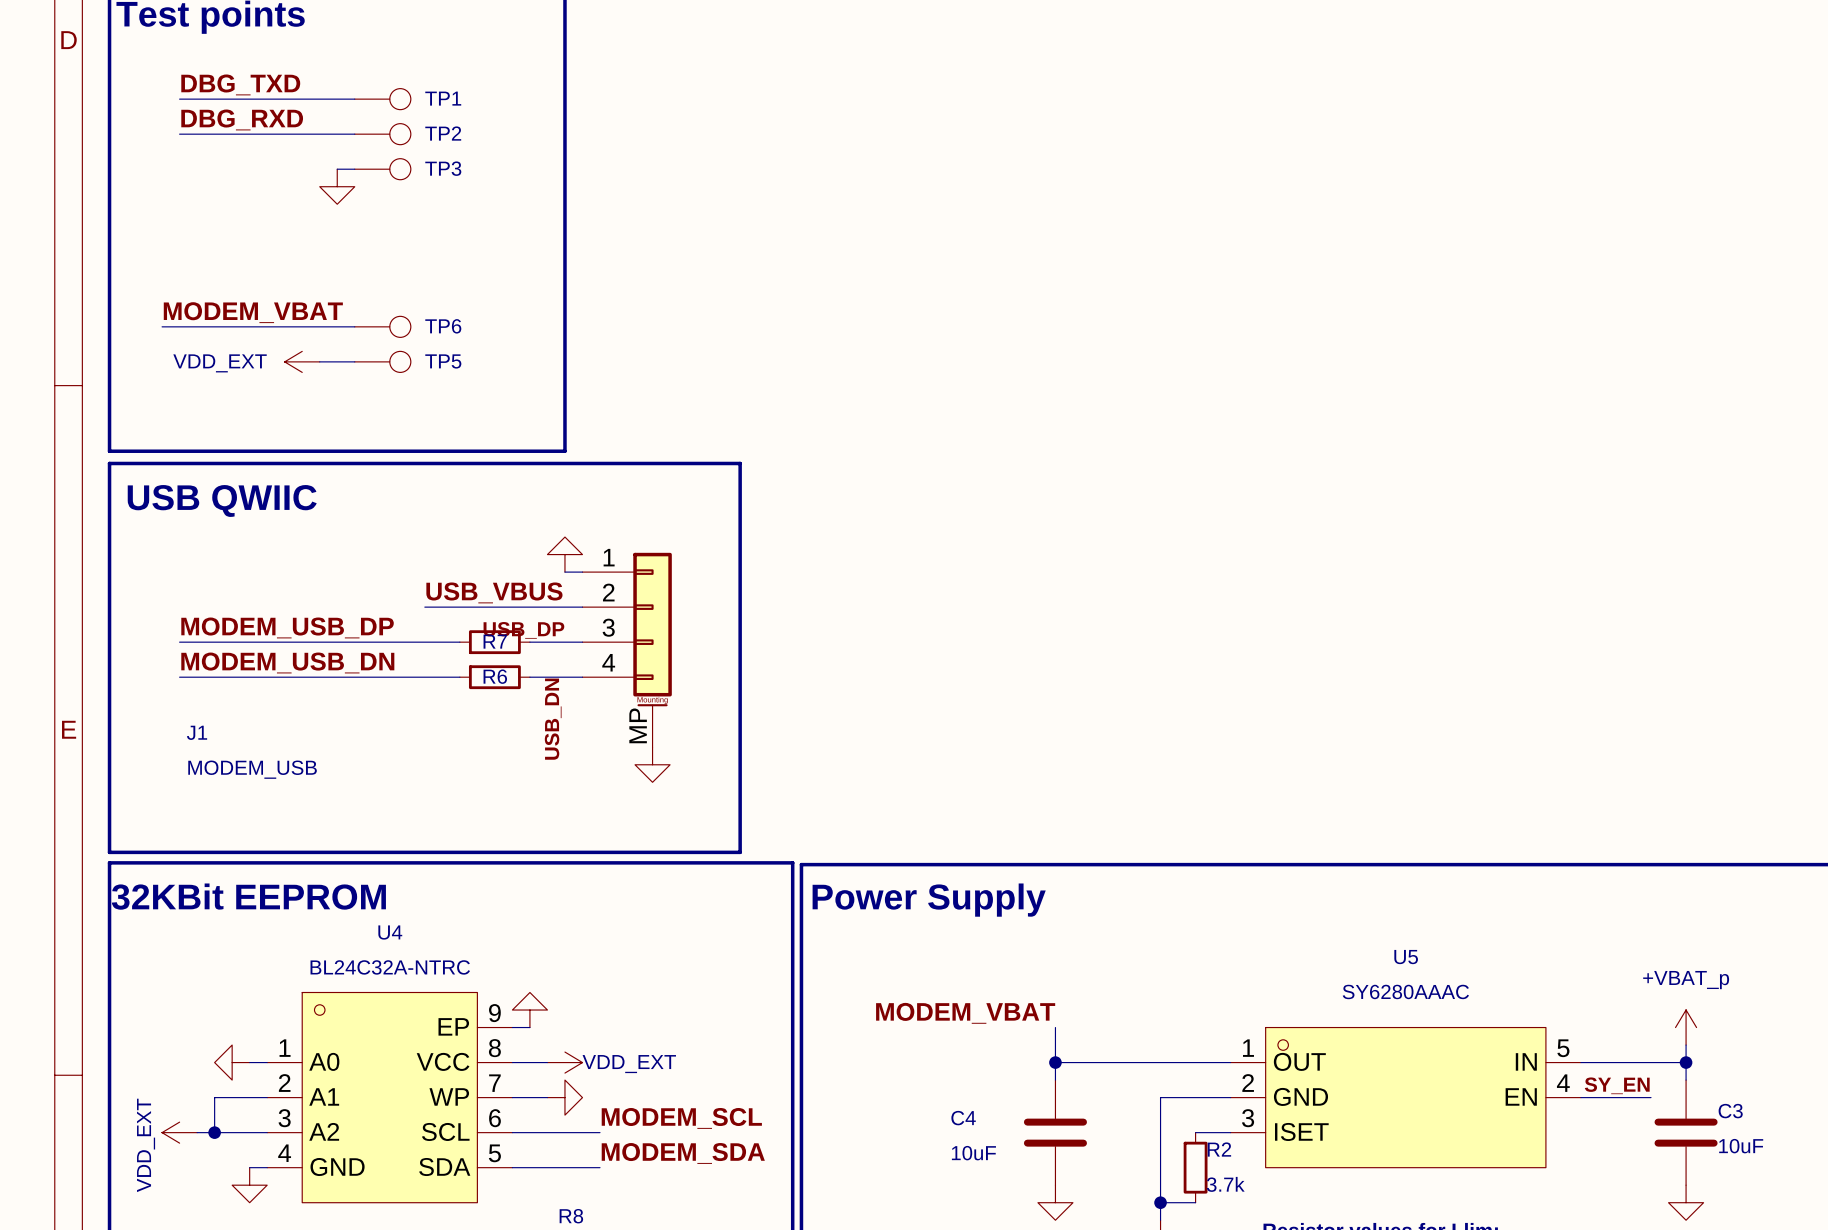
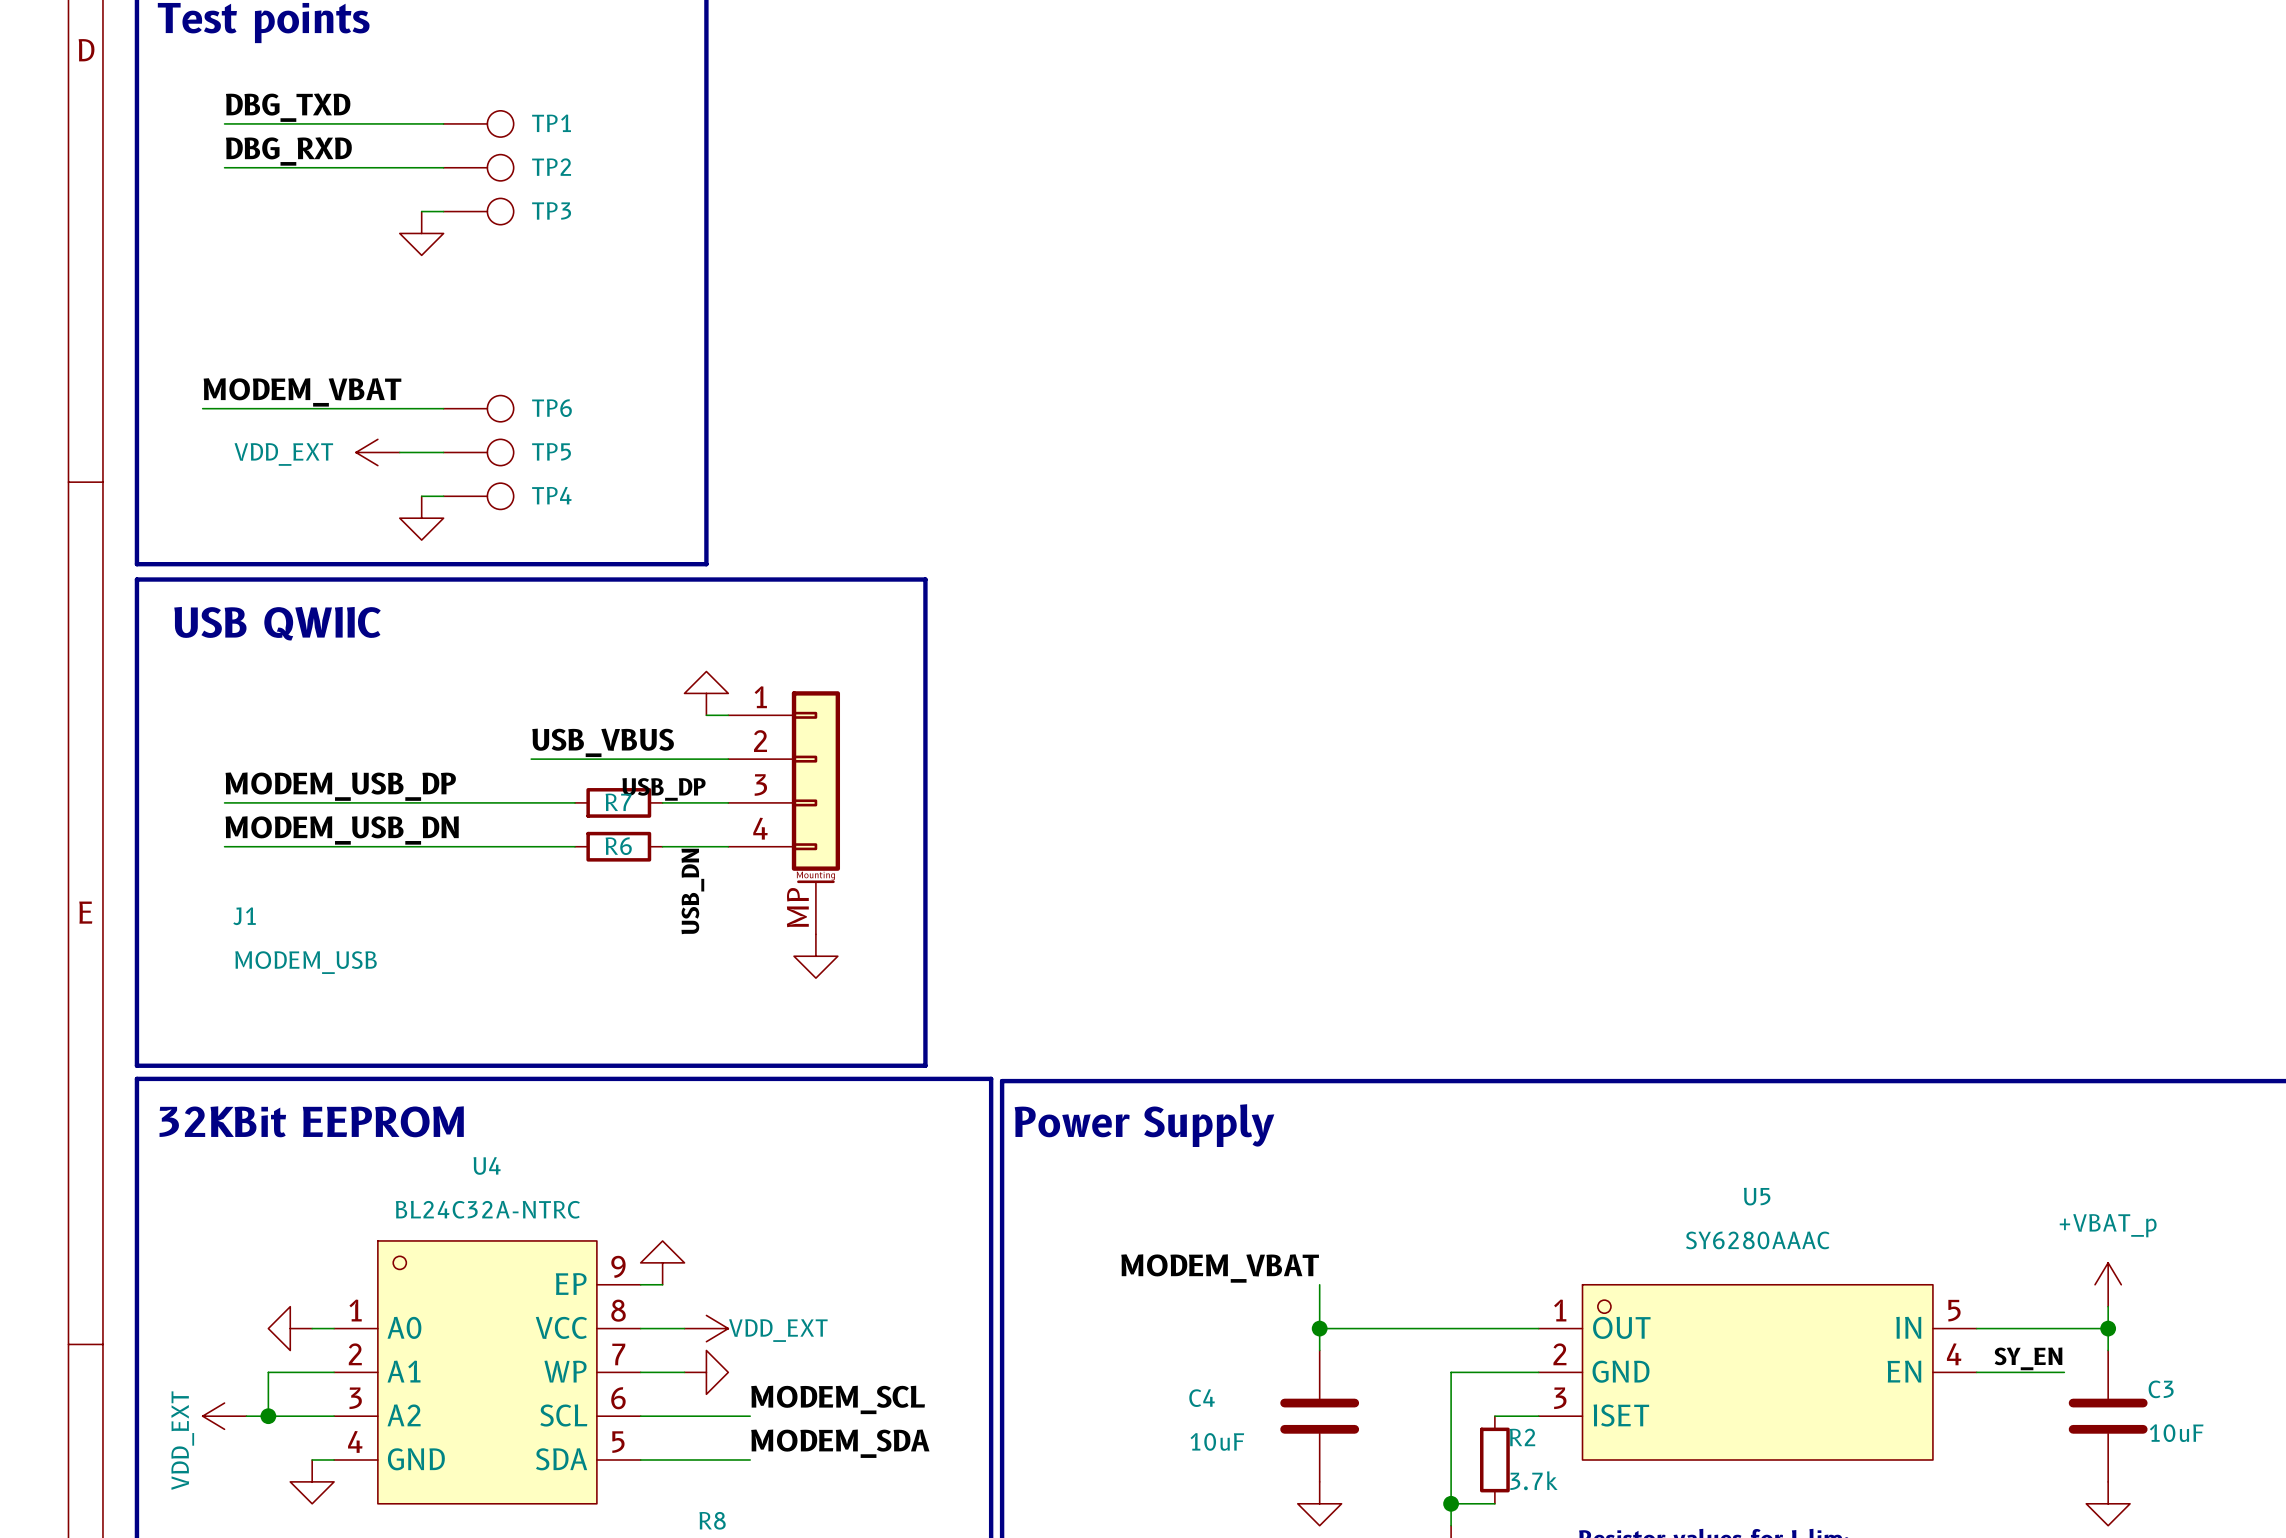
wire: none -> (421, 496) (443, 496)
TP4: none -> (478, 496)
power symbol: none -> (421, 518)

